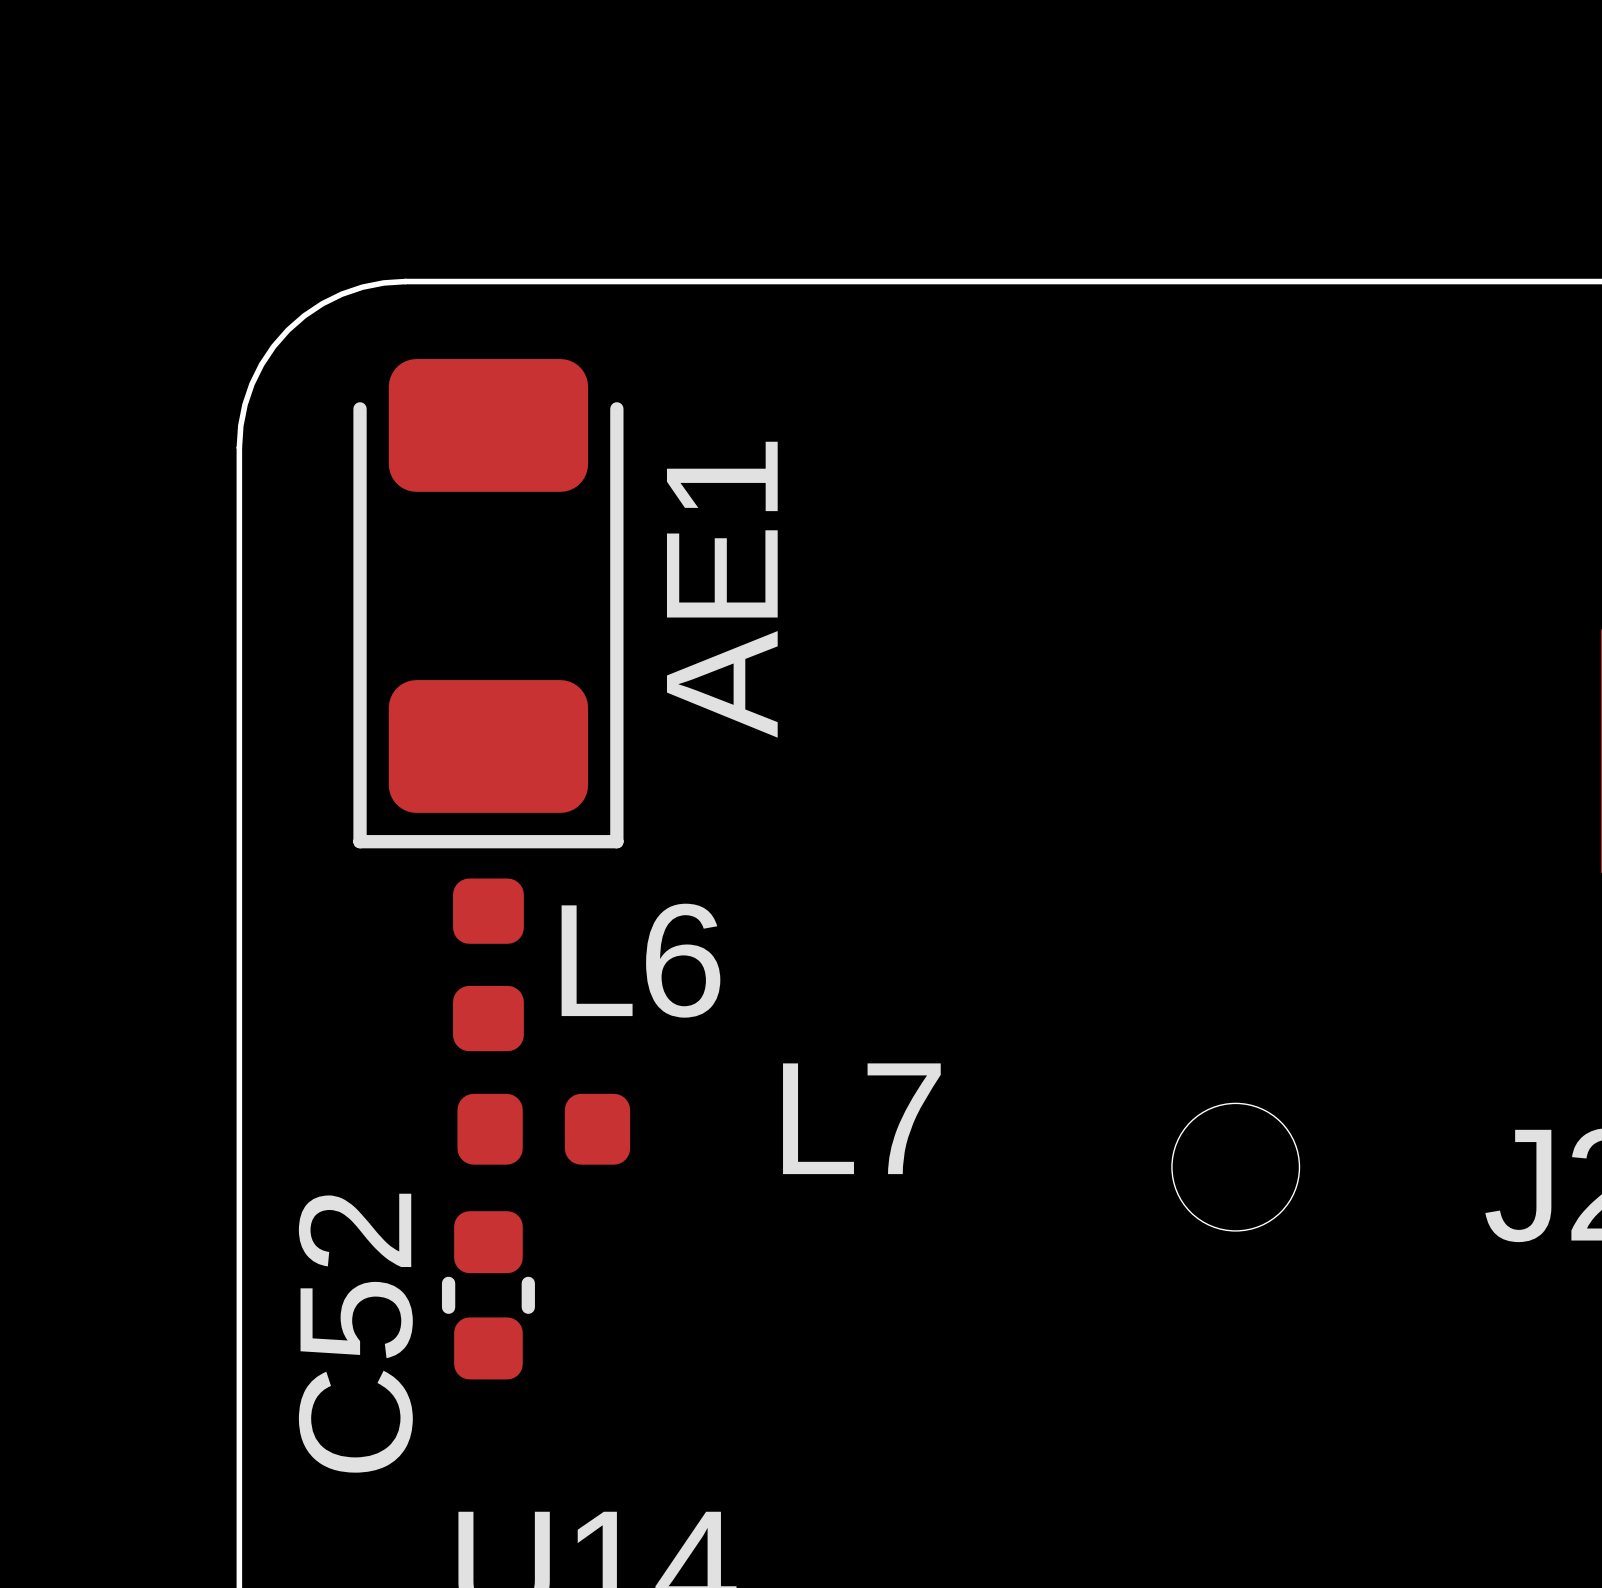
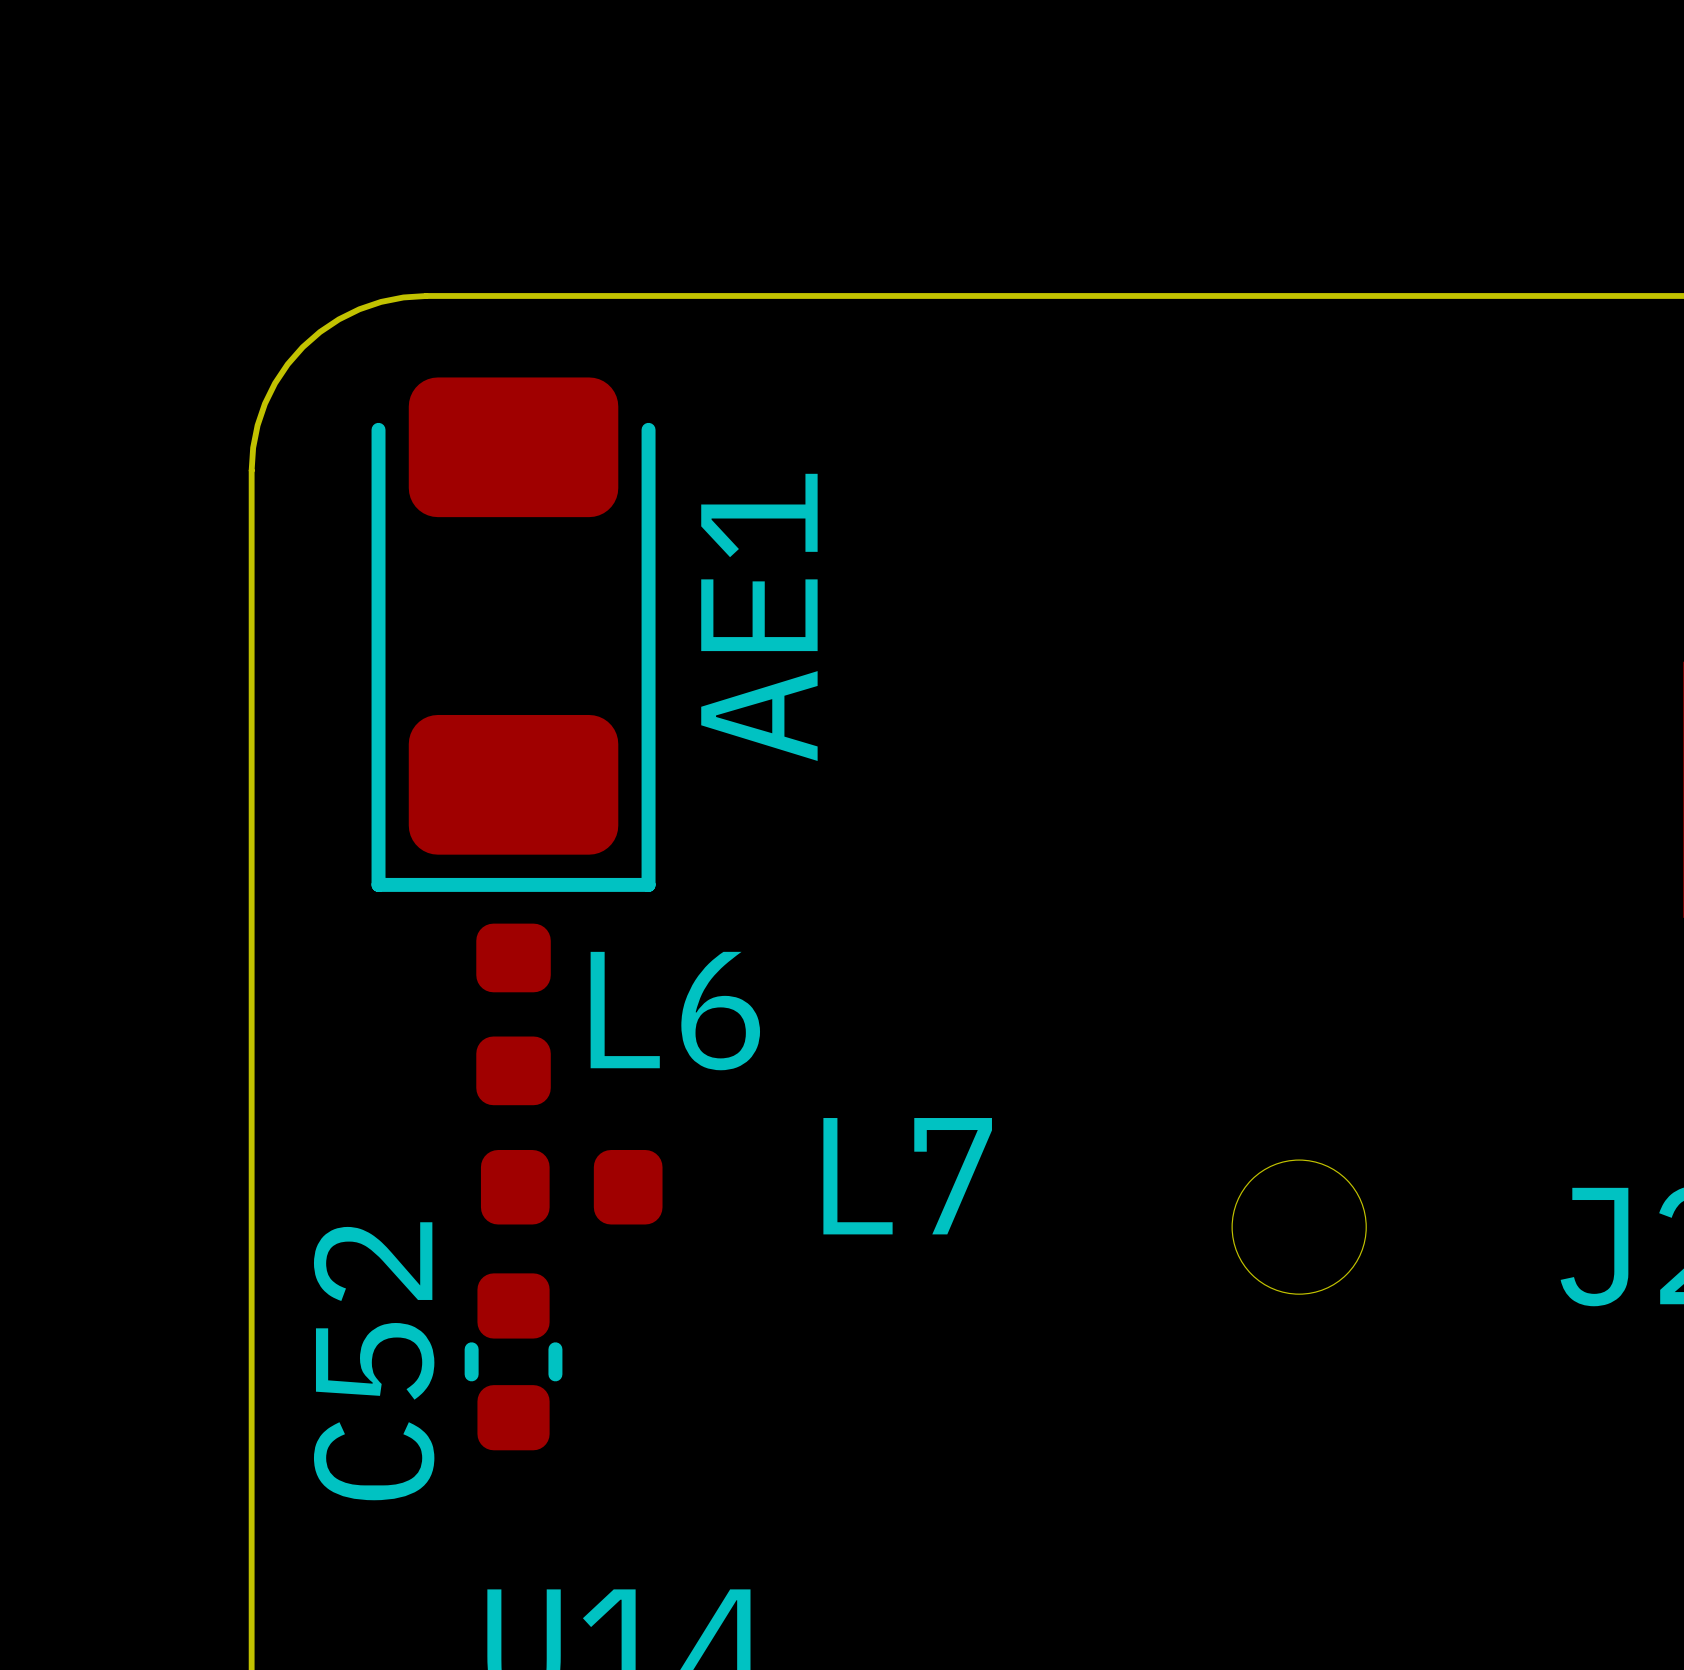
C52 name position: C52 (355, 1333) -> C52 (374, 1361)

